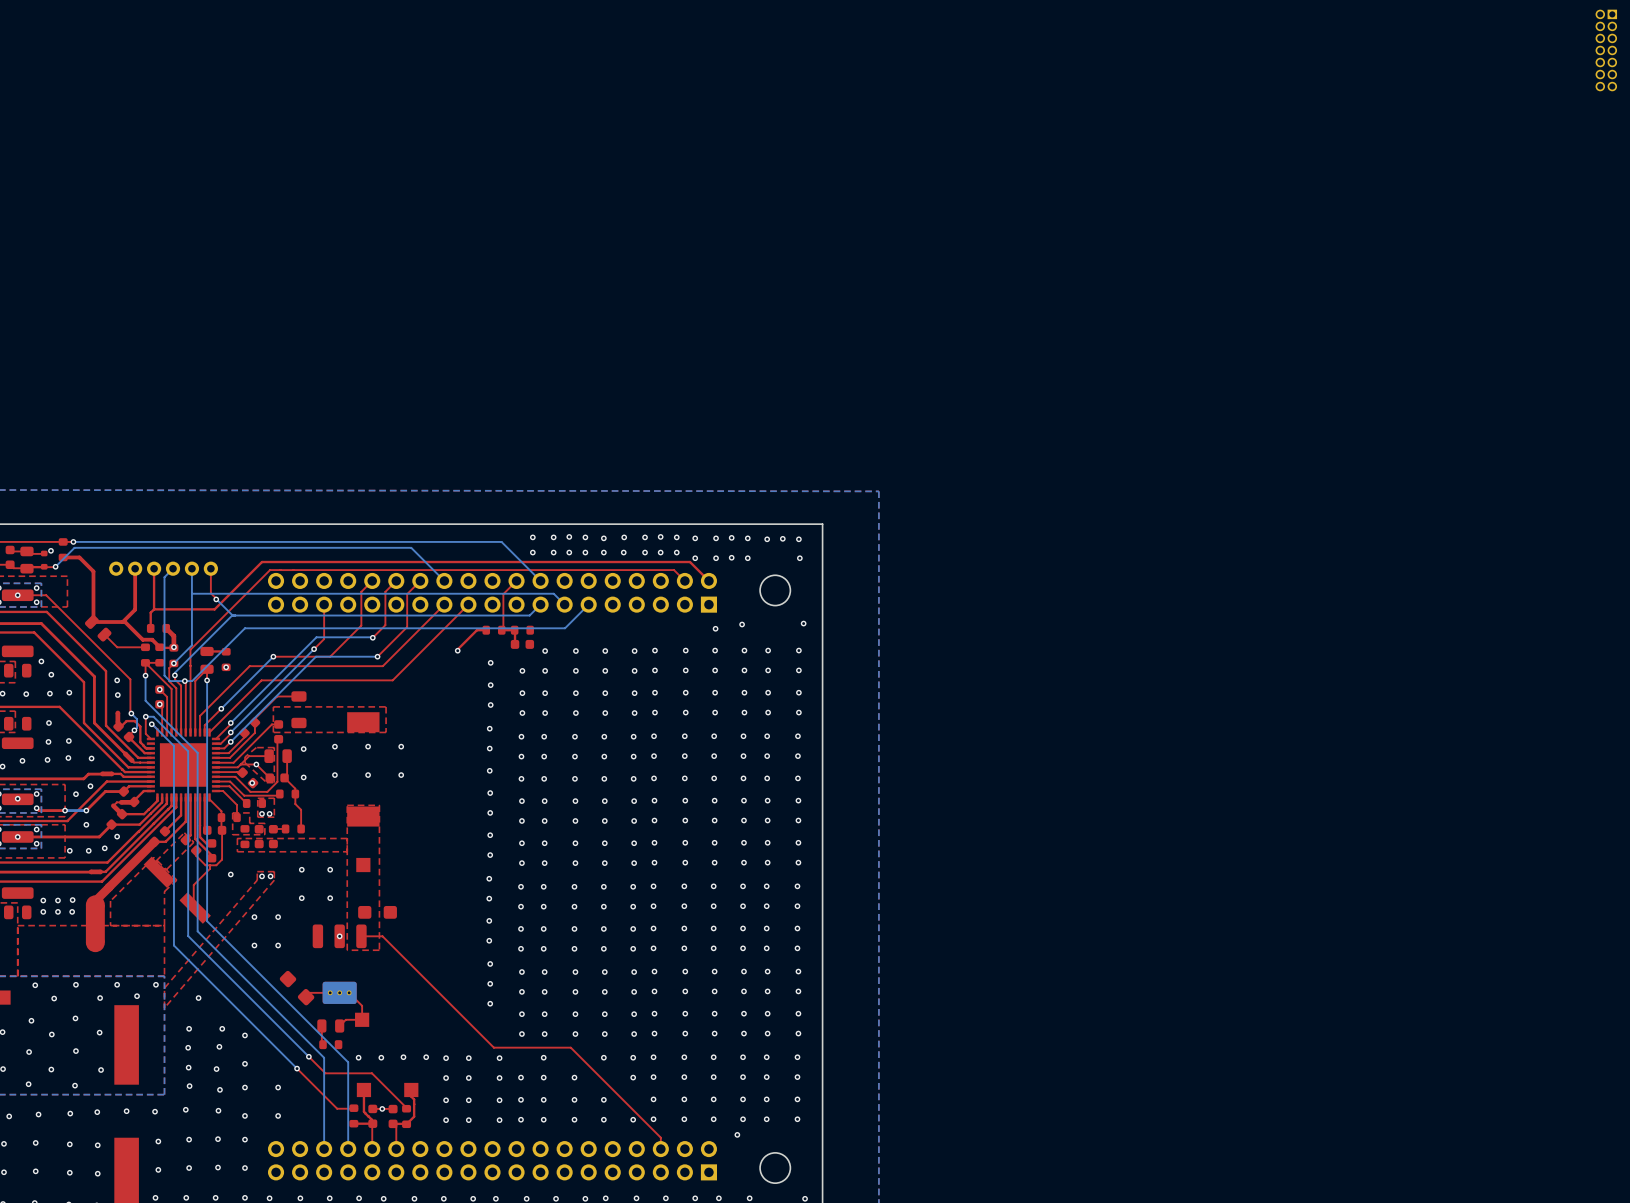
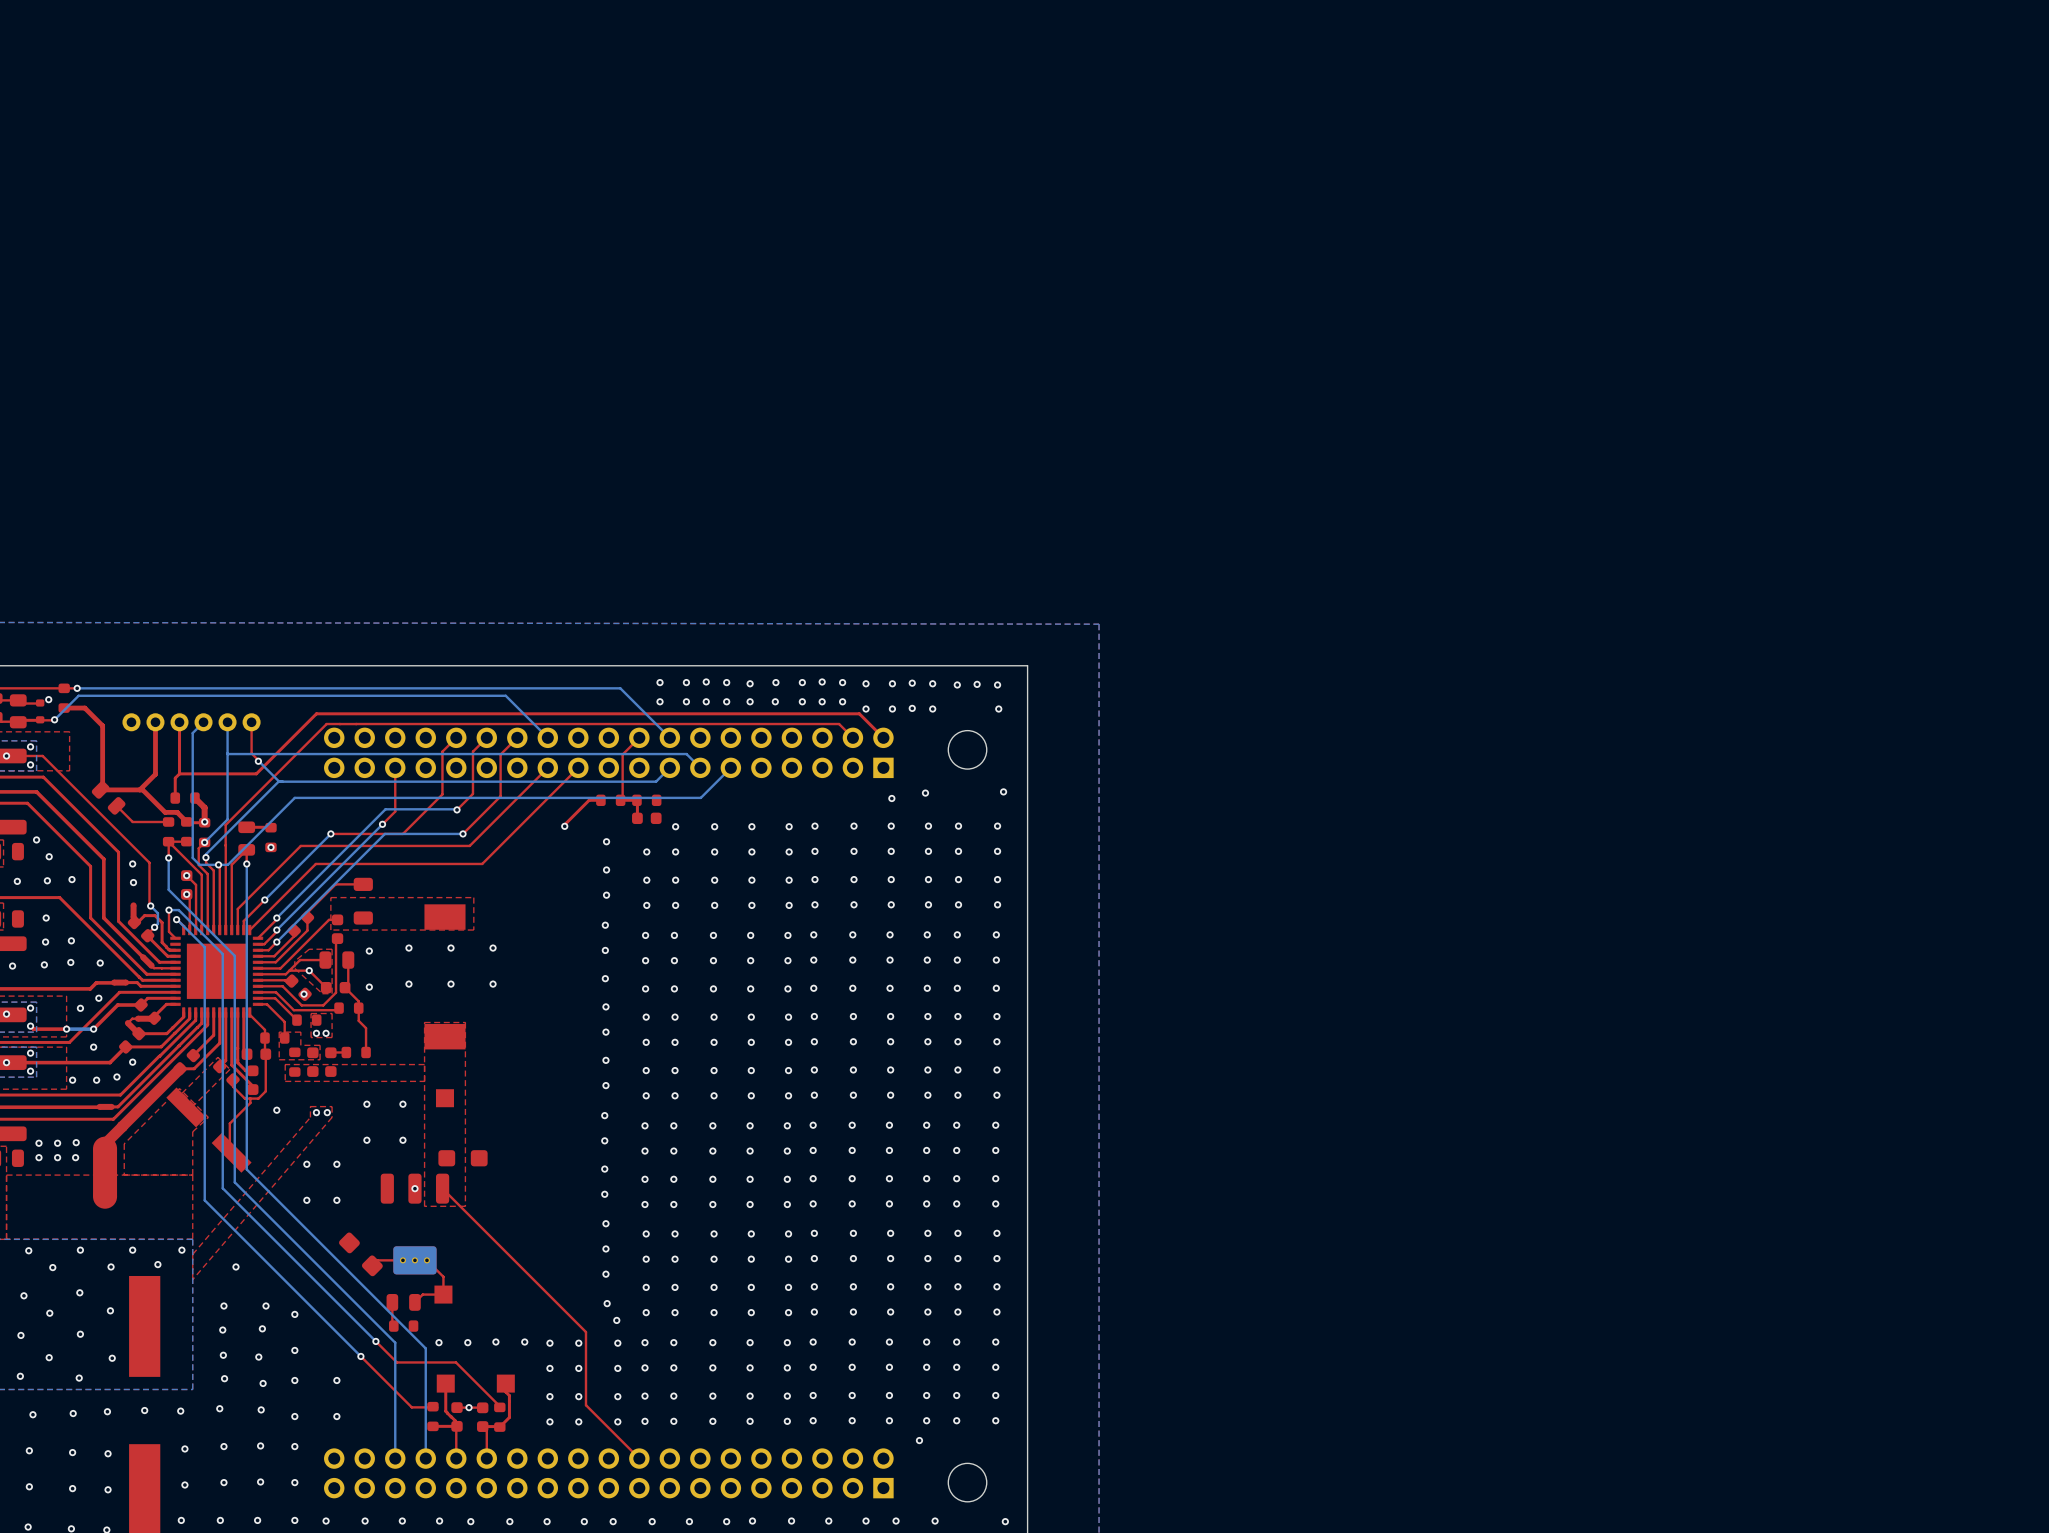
part: (1606, 50) -> none
top track: (361, 936) (382, 936) (493, 1047) (570, 1047) (660, 1137) (660, 1149) -> (442, 1188) (585, 1332) (585, 1405) (639, 1458)
via: none -> (607, 1303)
via: none -> (616, 1320)
via: none -> (644, 1342)
via: none -> (712, 1342)
via: none -> (750, 1367)
via: none -> (787, 1396)

